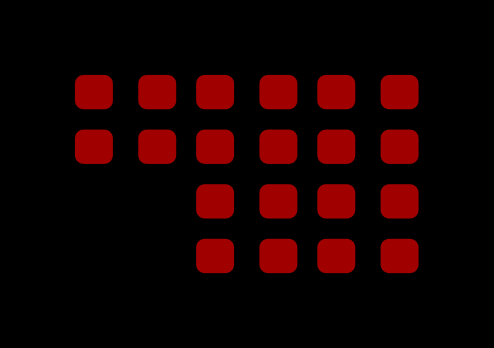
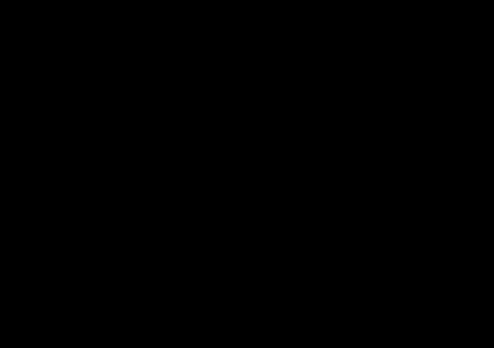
part: (125, 92) -> none
part: (246, 92) -> none
part: (367, 92) -> none
part: (125, 146) -> none
part: (246, 146) -> none
part: (367, 146) -> none
part: (246, 201) -> none
part: (367, 201) -> none
part: (246, 255) -> none
part: (367, 255) -> none

